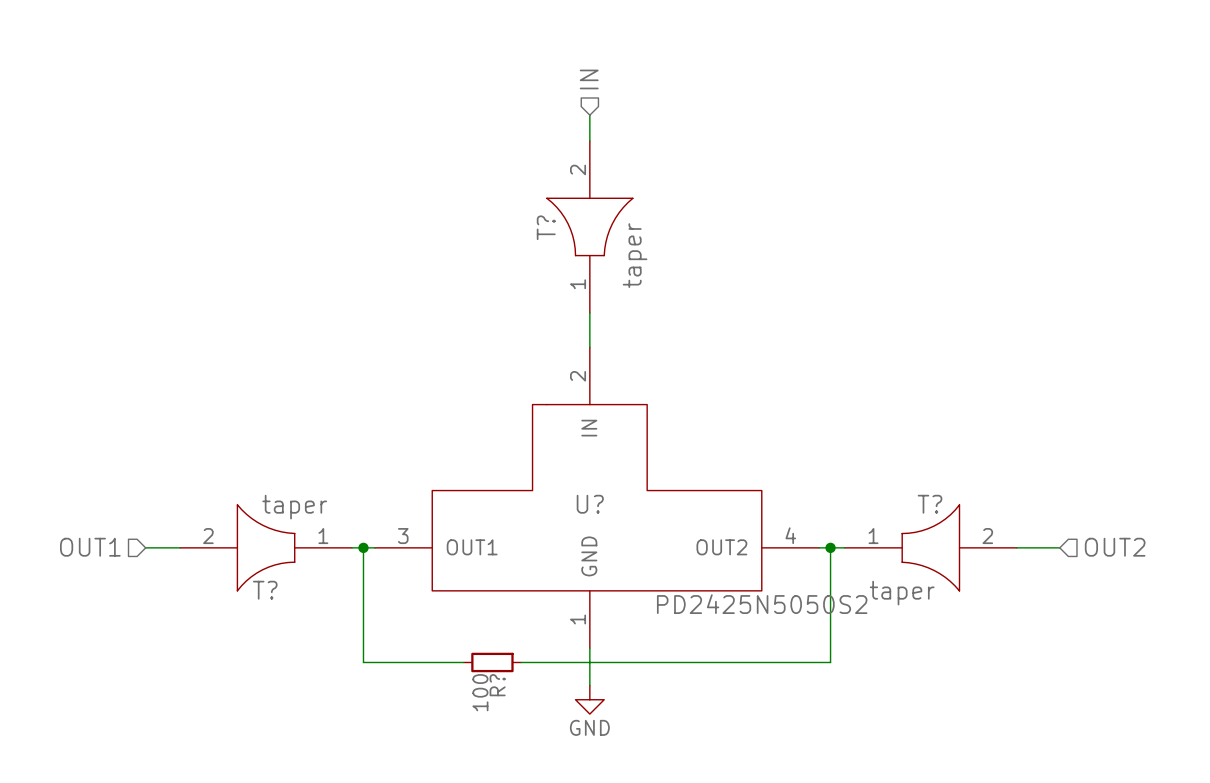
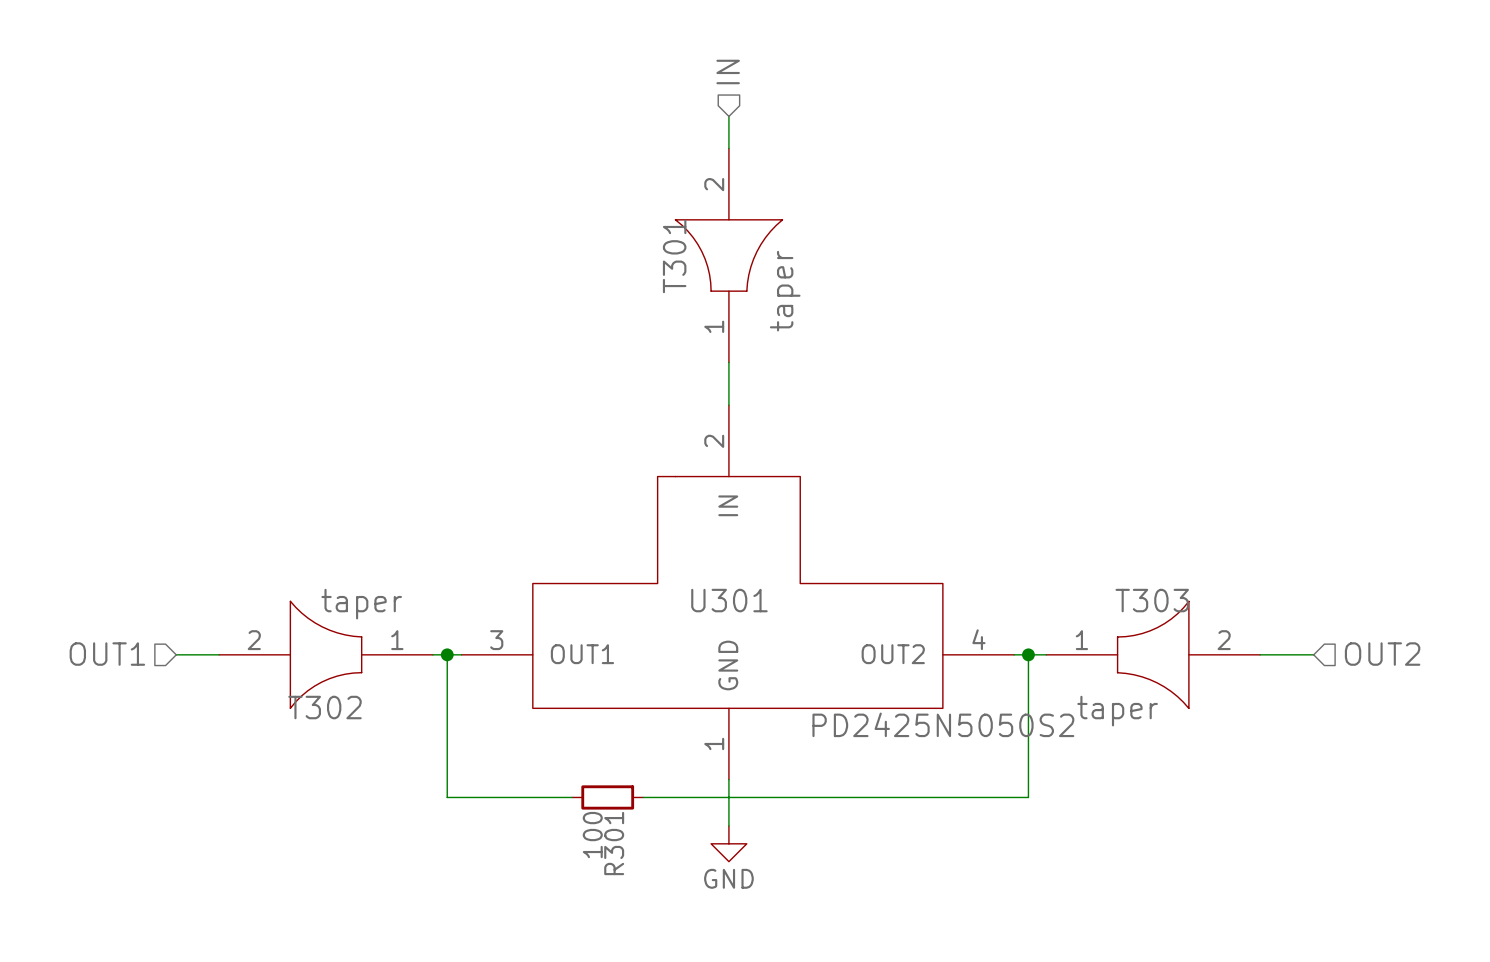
T? name: T? (546, 227) -> T301 (674, 256)
U? name: U? (590, 504) -> U301 (729, 600)
T? name: T? (930, 504) -> T303 (1152, 600)
T? name: T? (265, 590) -> T302 (325, 707)
R? name: R? (497, 685) -> R301 (614, 843)

